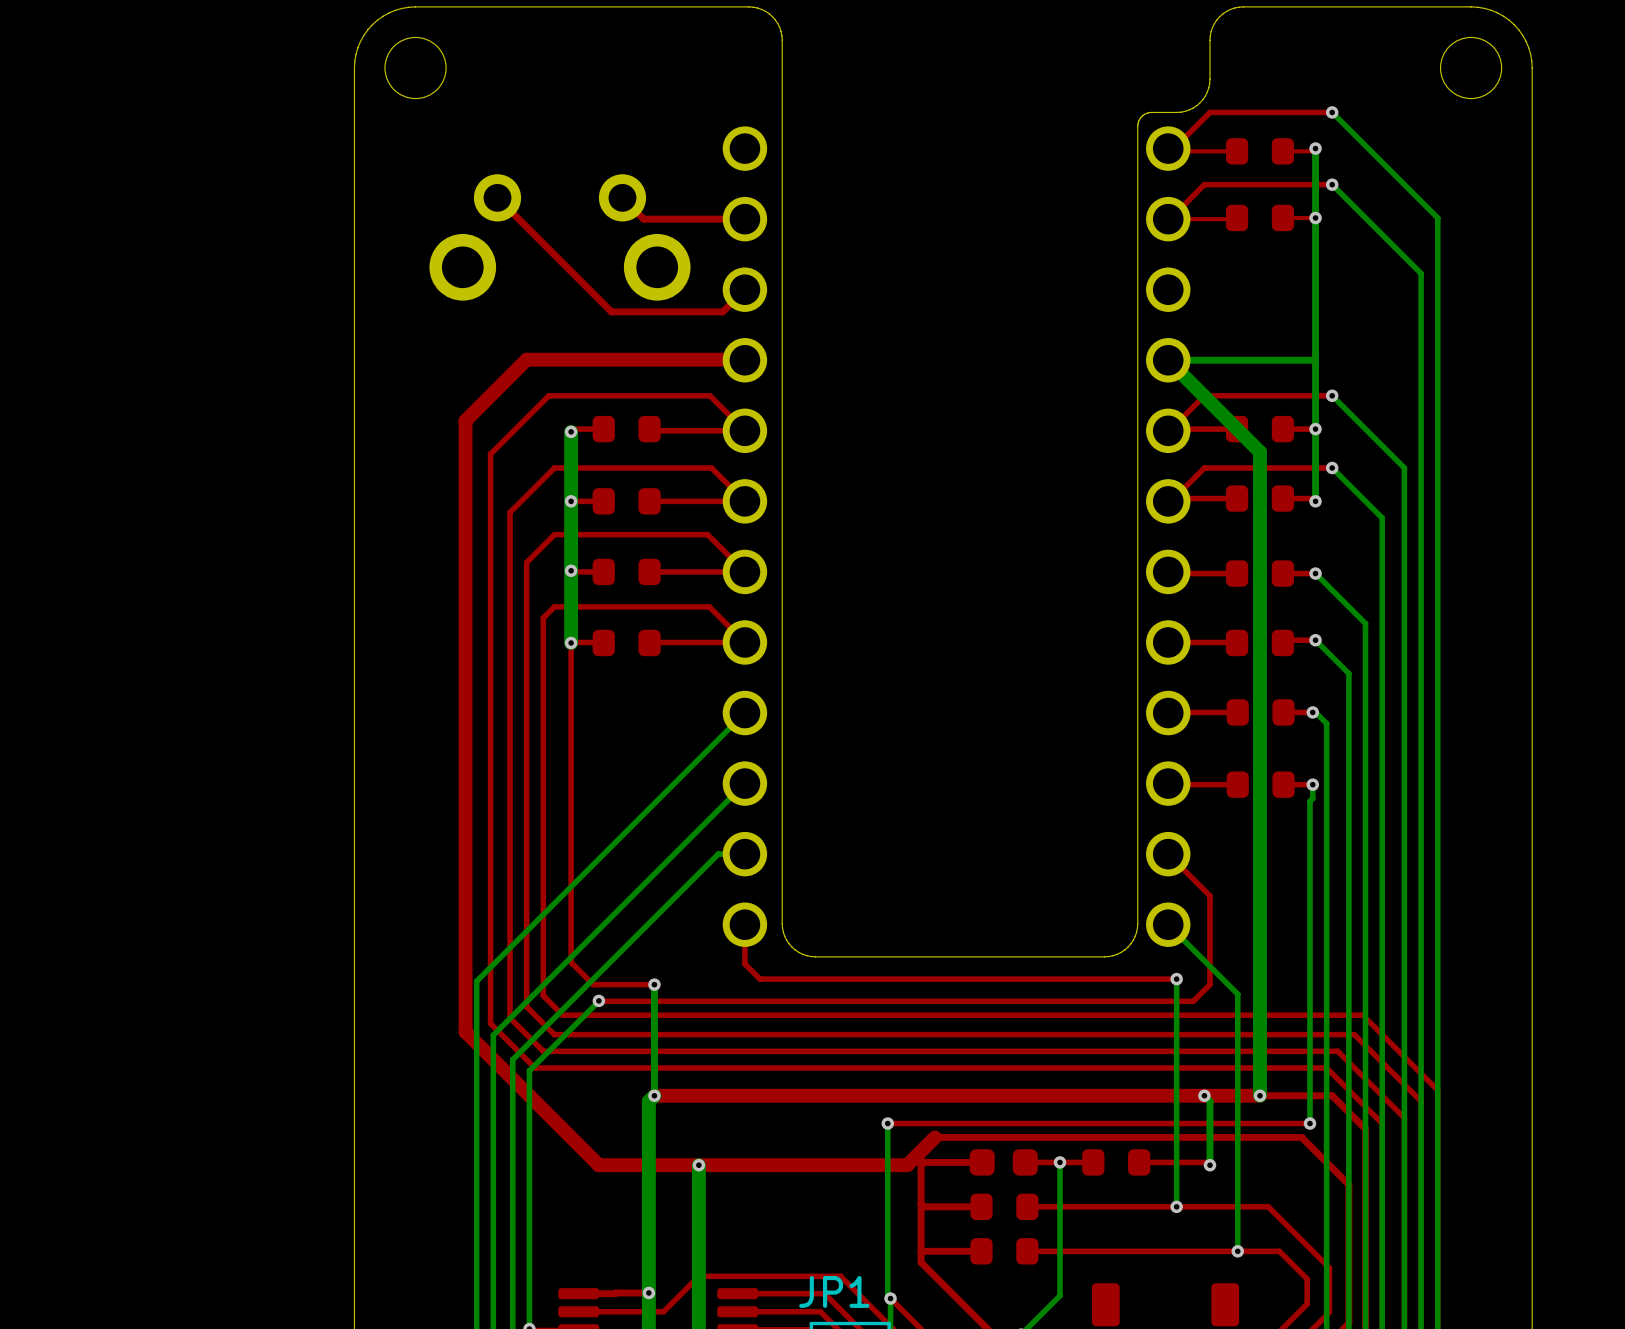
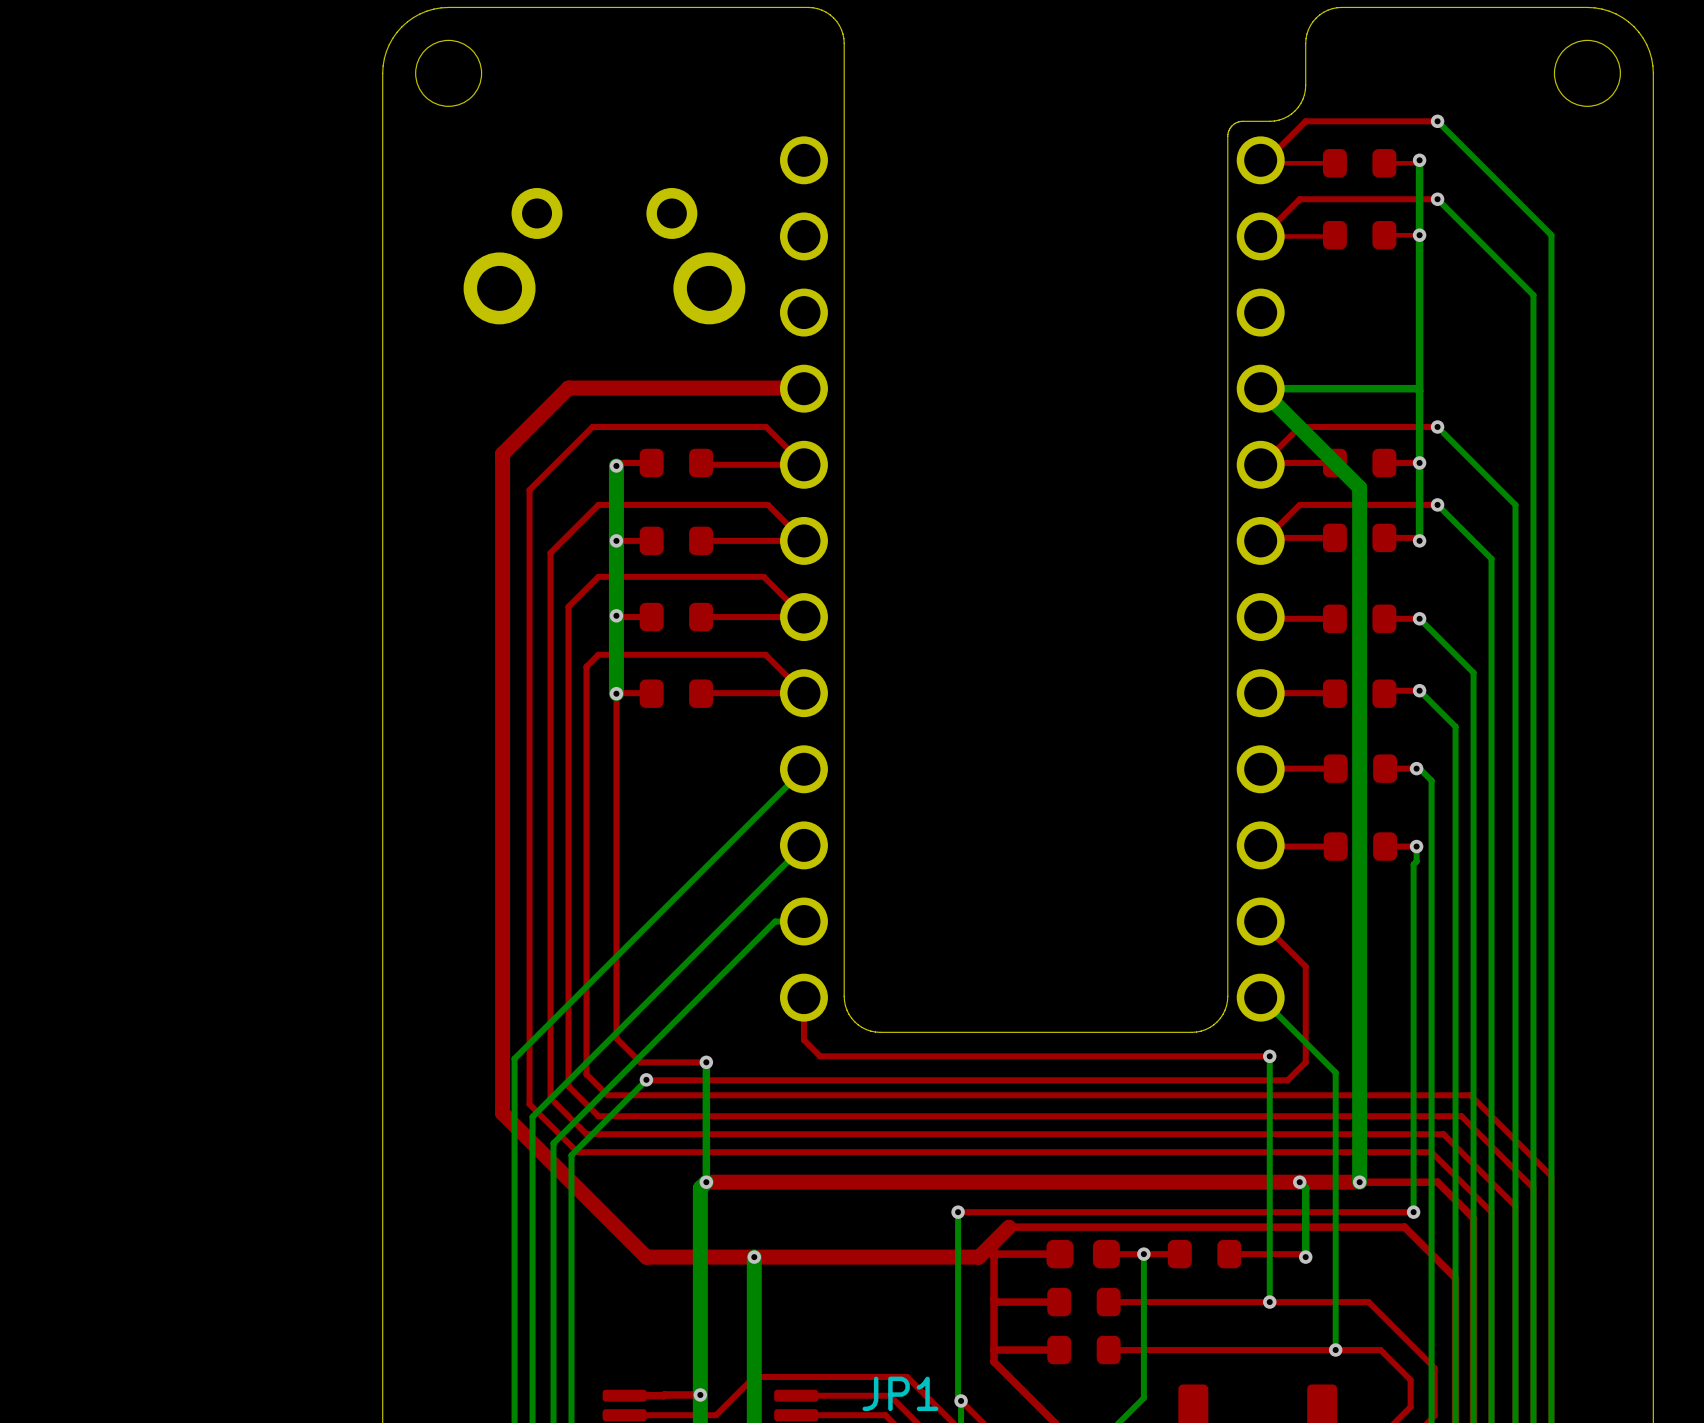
top track: (497, 197) (611, 311) (722, 311) (744, 289) -> none
top track: (622, 197) (643, 219) (744, 219) -> none

